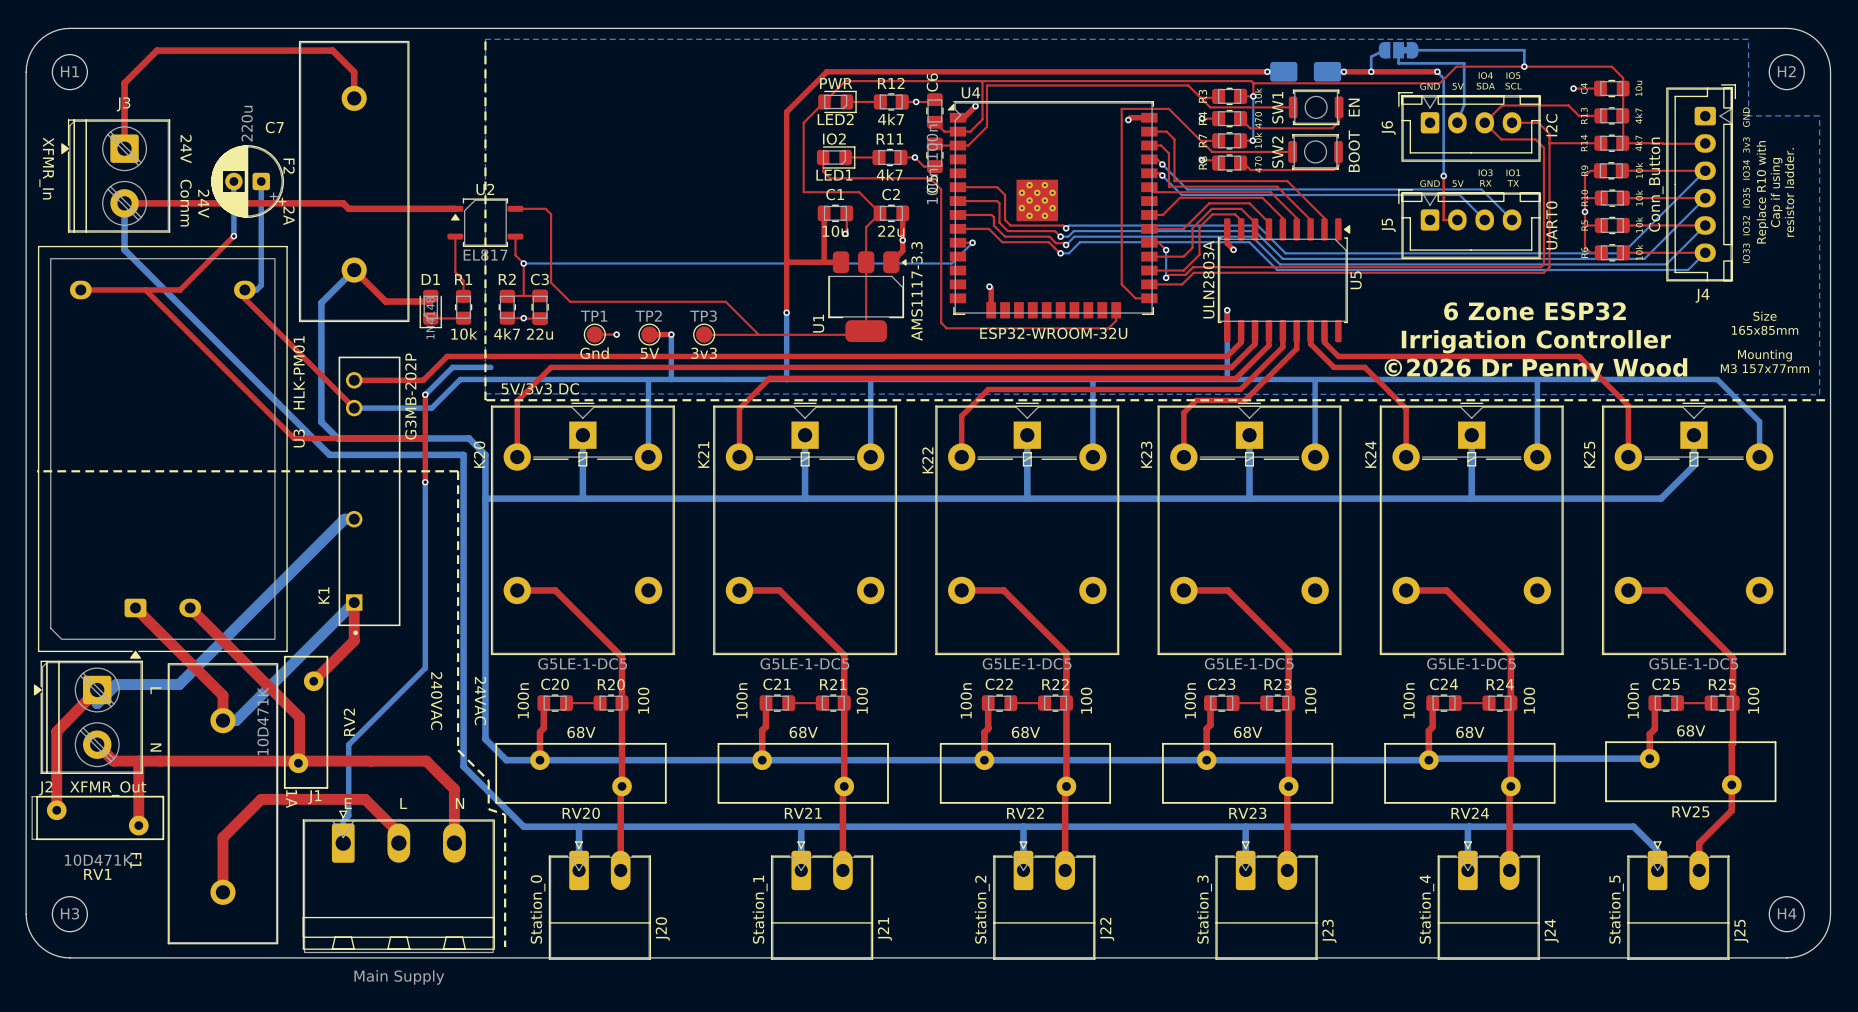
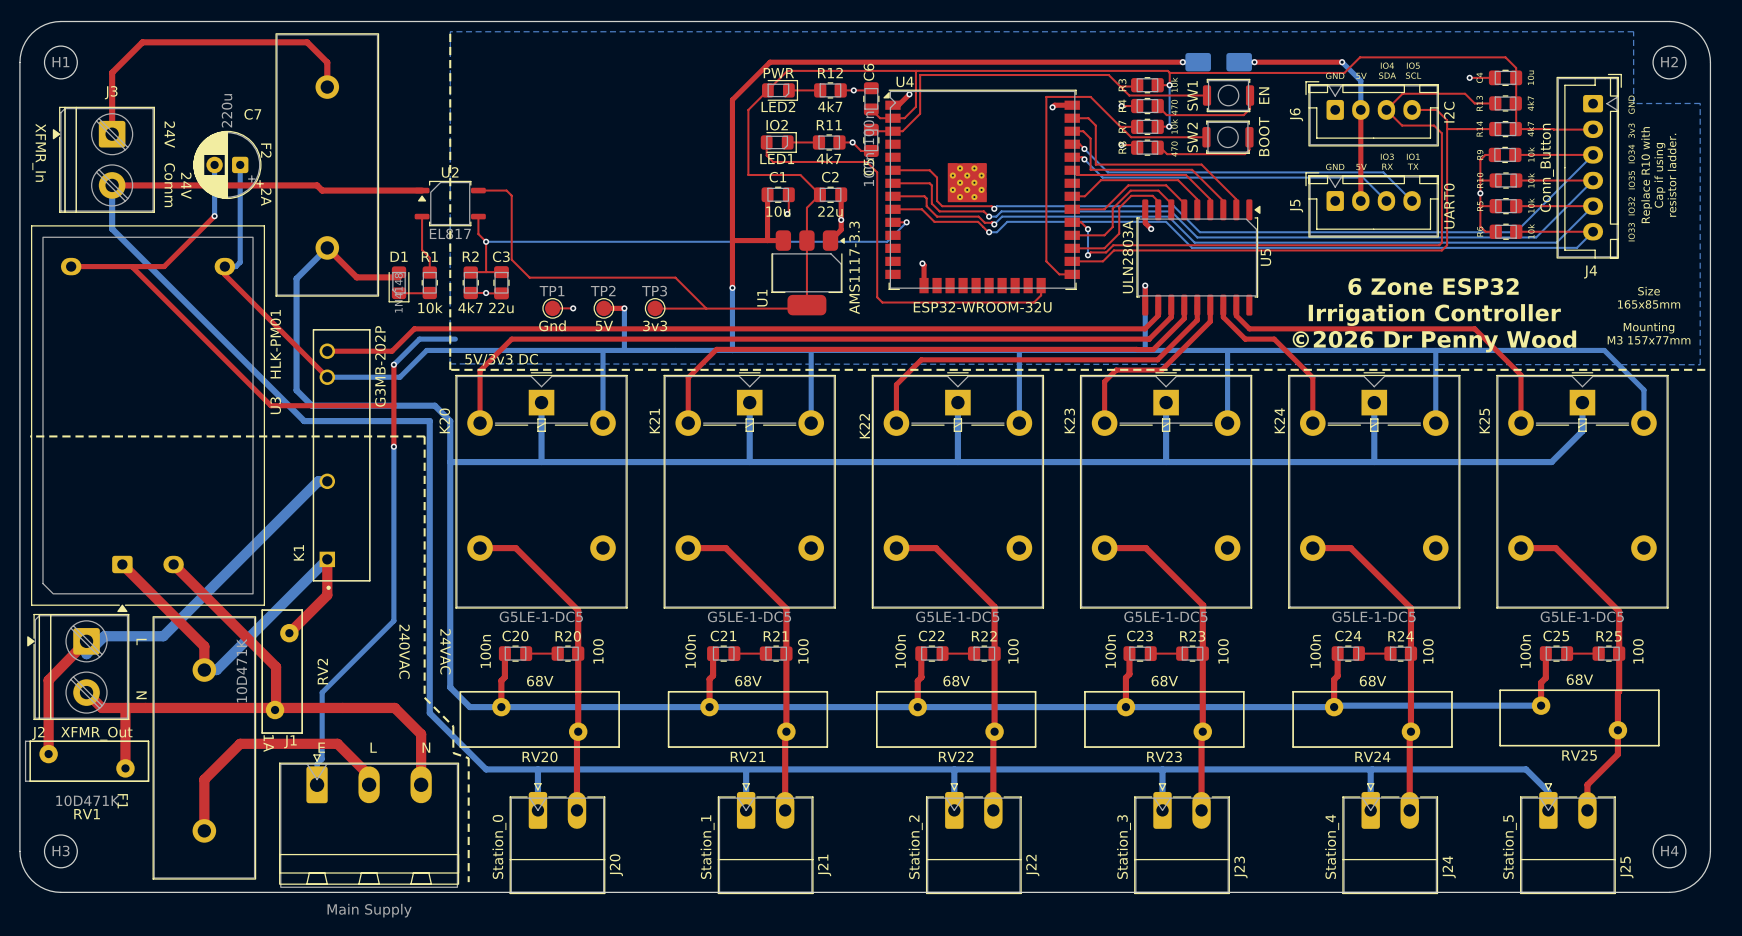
bottom track: (1384, 50) (1371, 56) (1371, 71) -> none
bottom track: (1398, 50) (1398, 63) (1464, 63) (1464, 104) (1457, 122) -> (1342, 62) (1360, 80) (1360, 109)
part: (1398, 50) -> none
bottom track: (1412, 50) (1524, 50) (1524, 66) -> none
via: (1524, 66) -> none
via: (1371, 71) -> none
bottom track: (1437, 71) (1443, 78) (1443, 176) -> none
top track: (1443, 176) (1443, 220) (1457, 220) -> (1360, 109) (1360, 201)
via: (1443, 176) -> none

